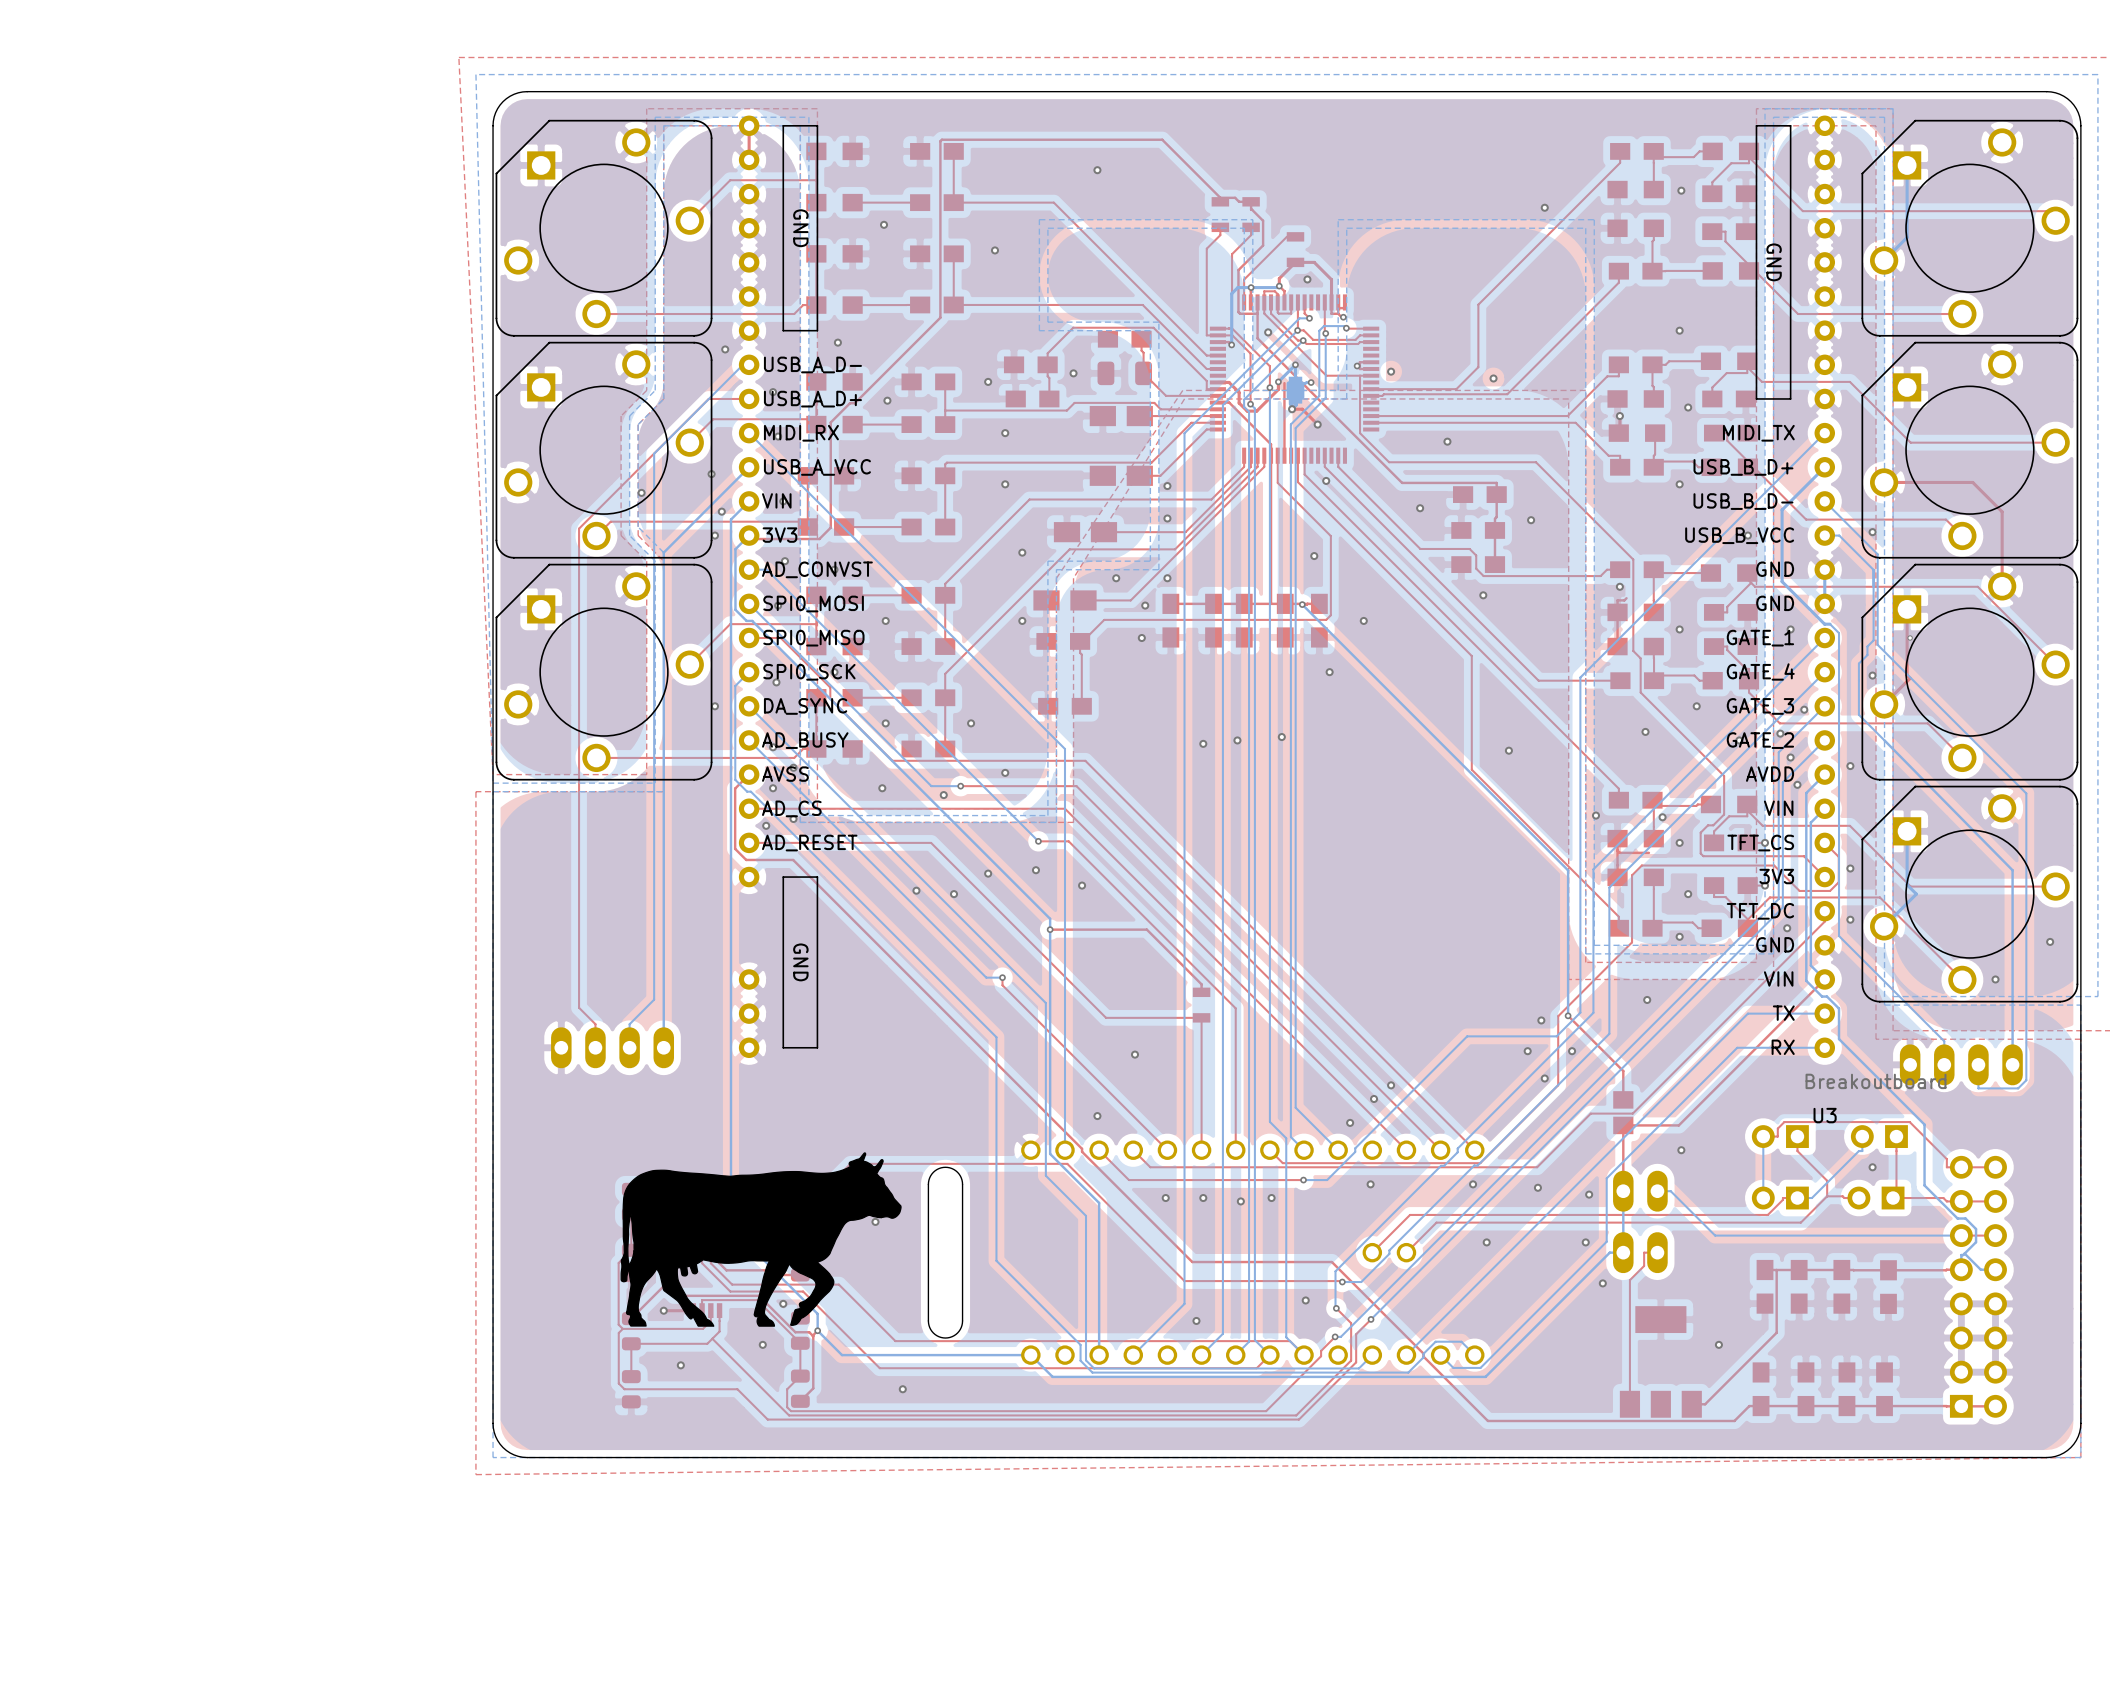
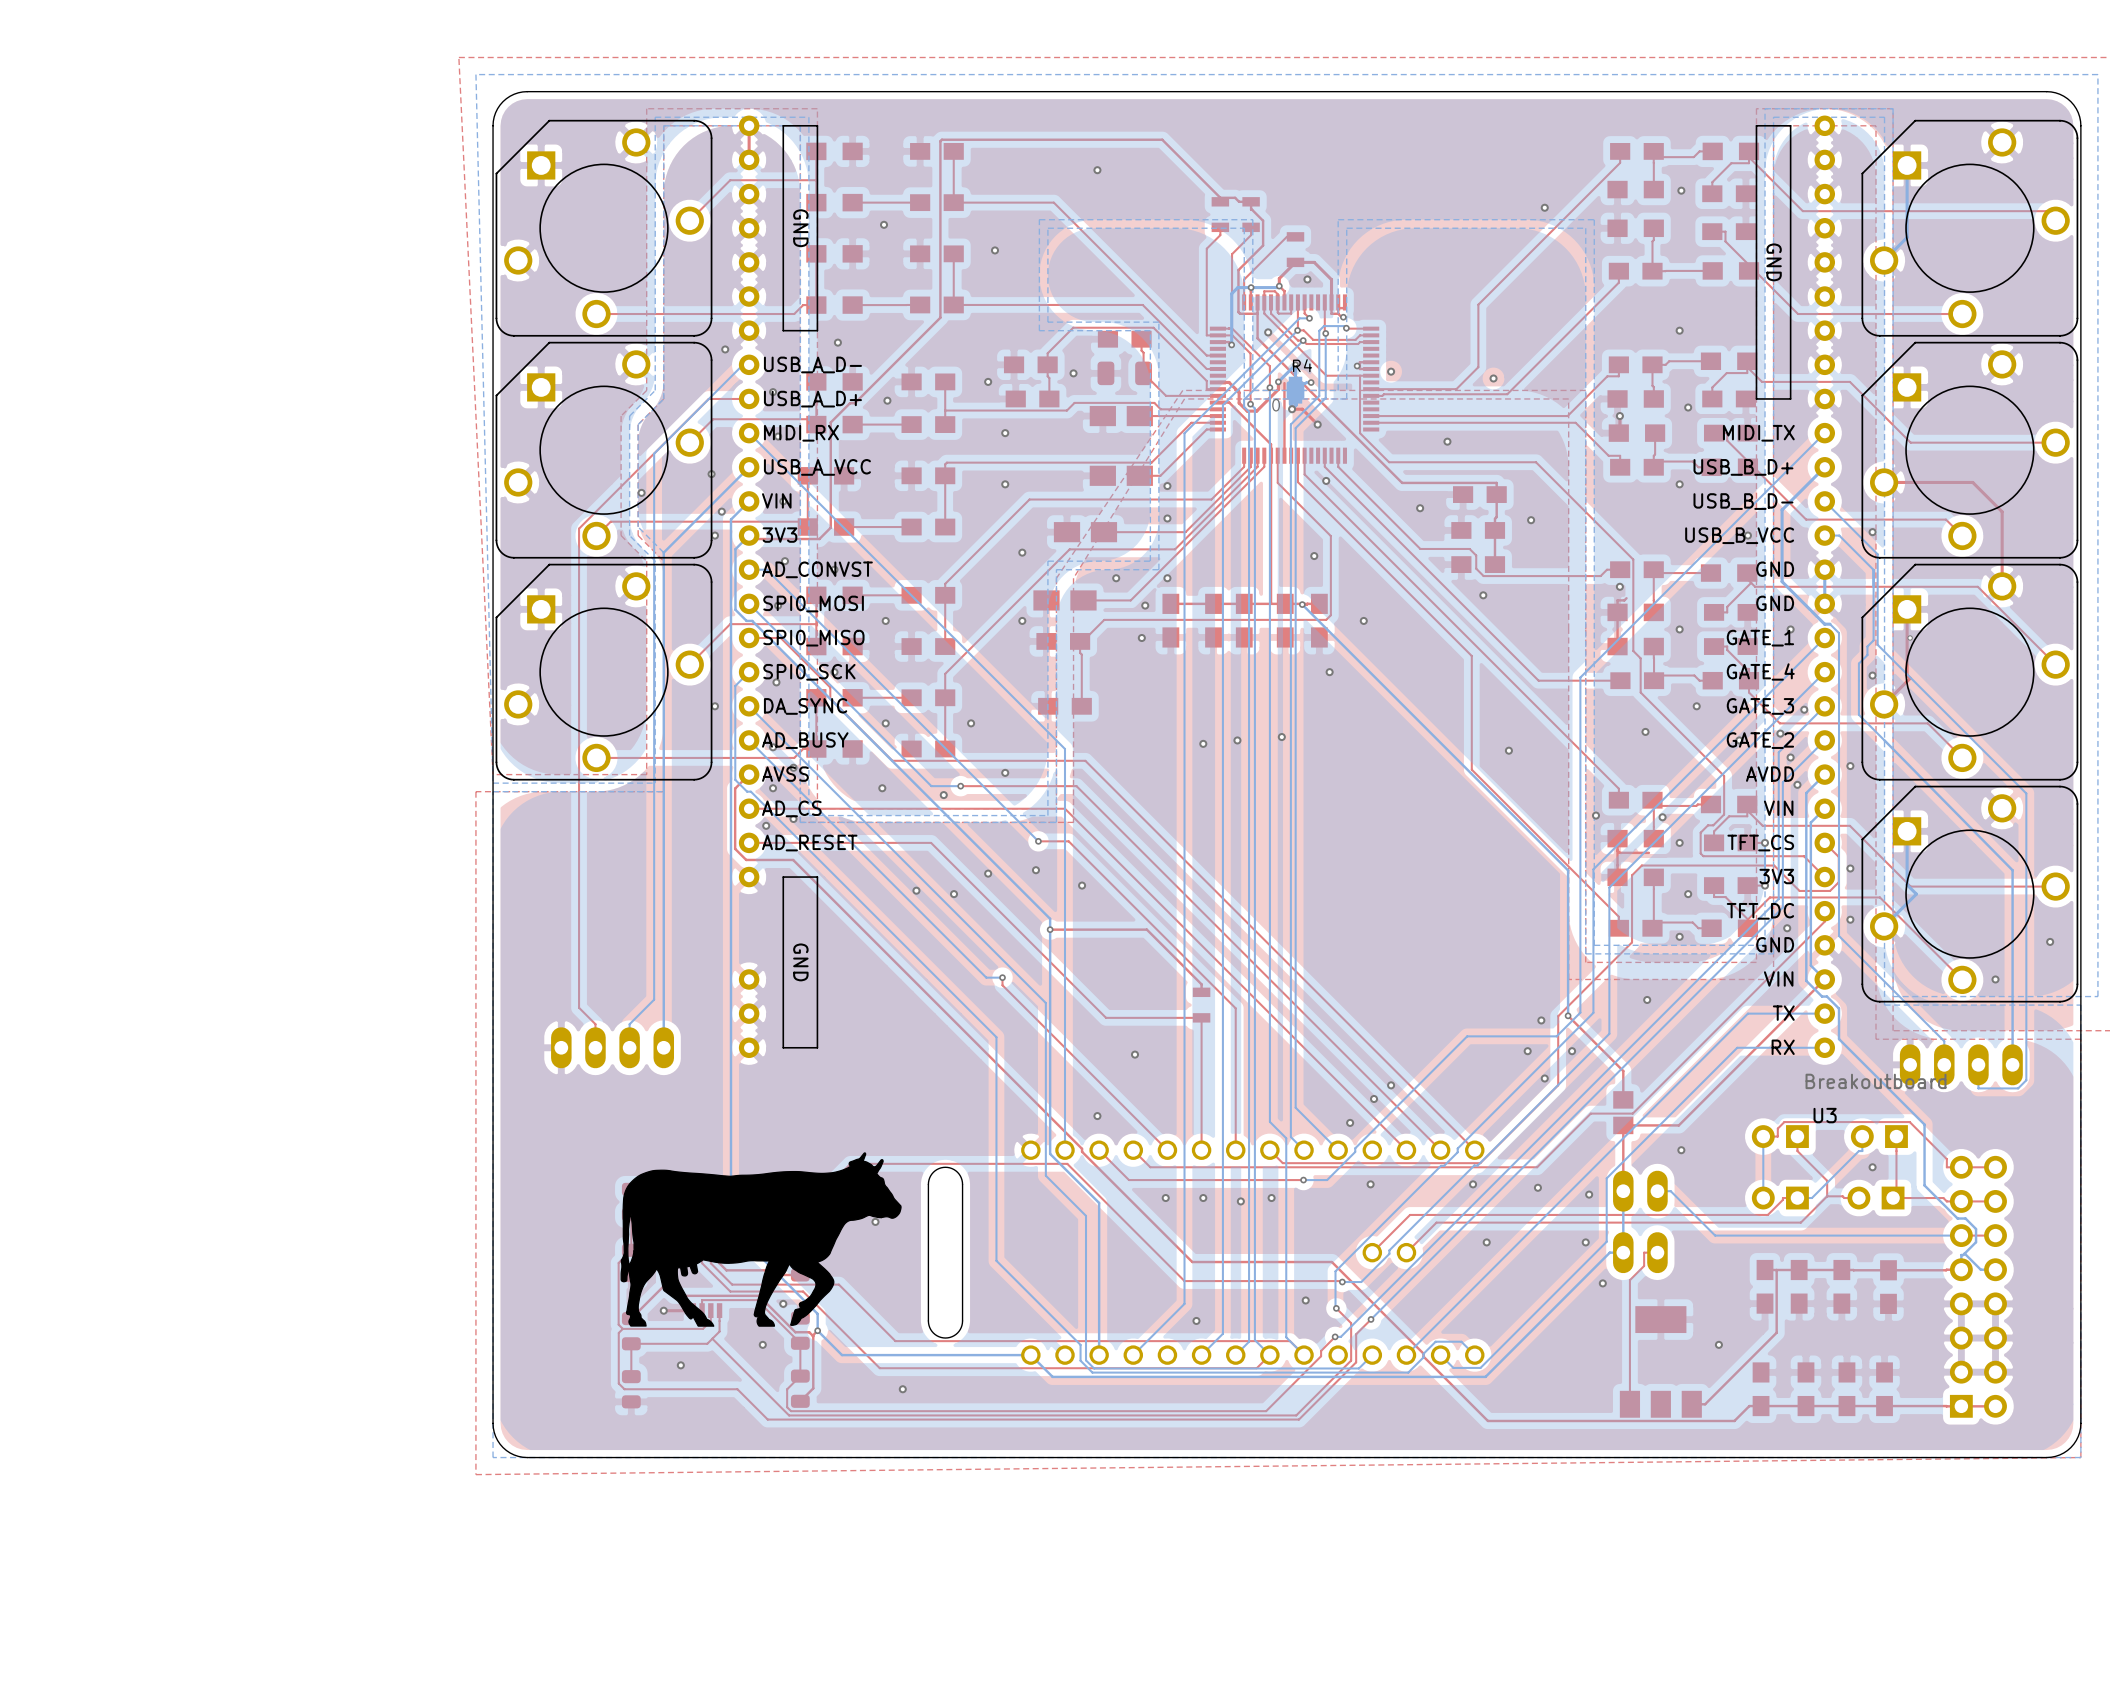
R4 name: none -> R4 (1302, 365)
R4 value: none -> 0 (1276, 405)

